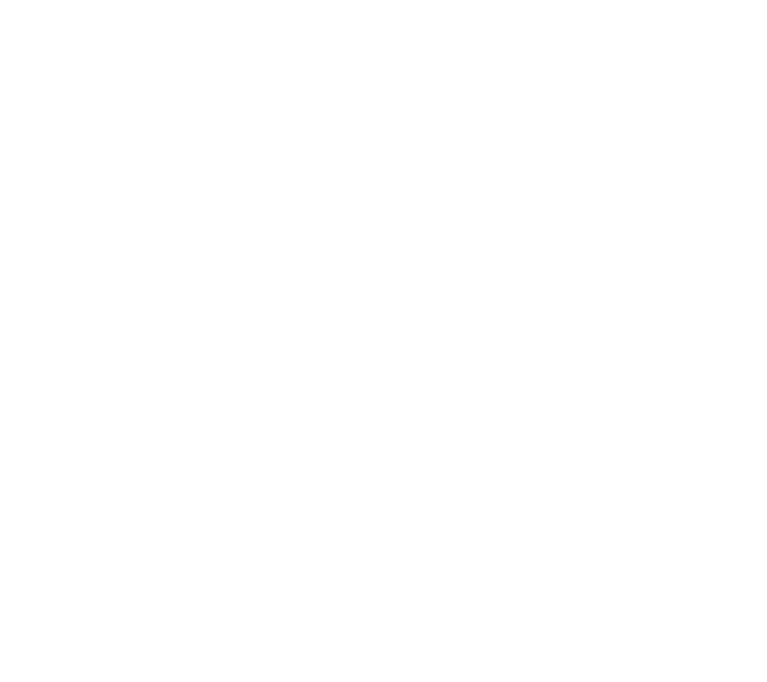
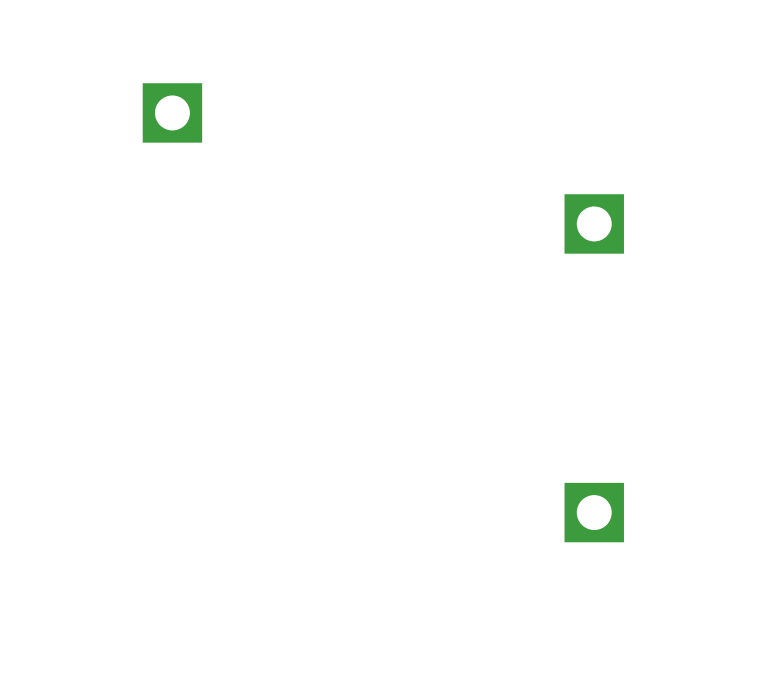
part: none -> (172, 112)
part: none -> (594, 223)
part: none -> (594, 512)

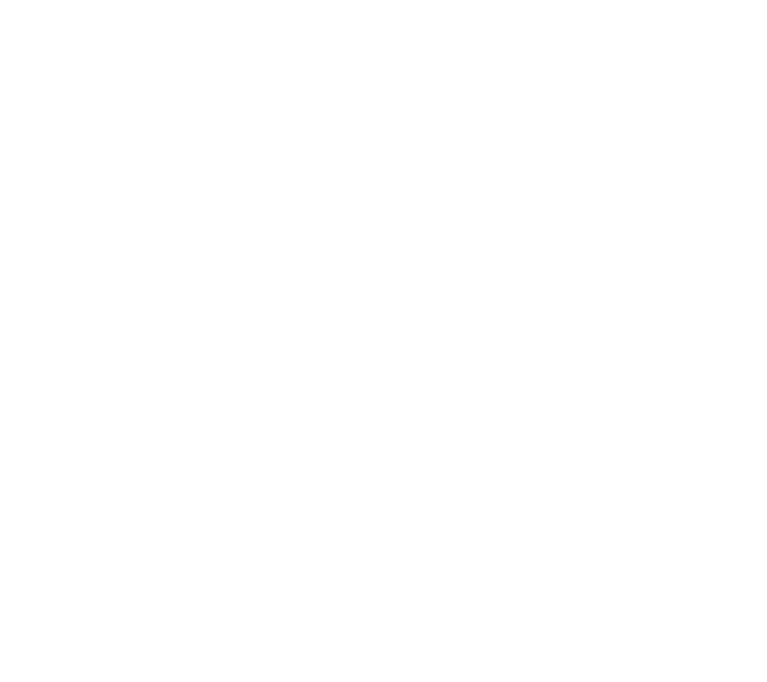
part: (172, 112) -> none
part: (594, 223) -> none
part: (594, 512) -> none

